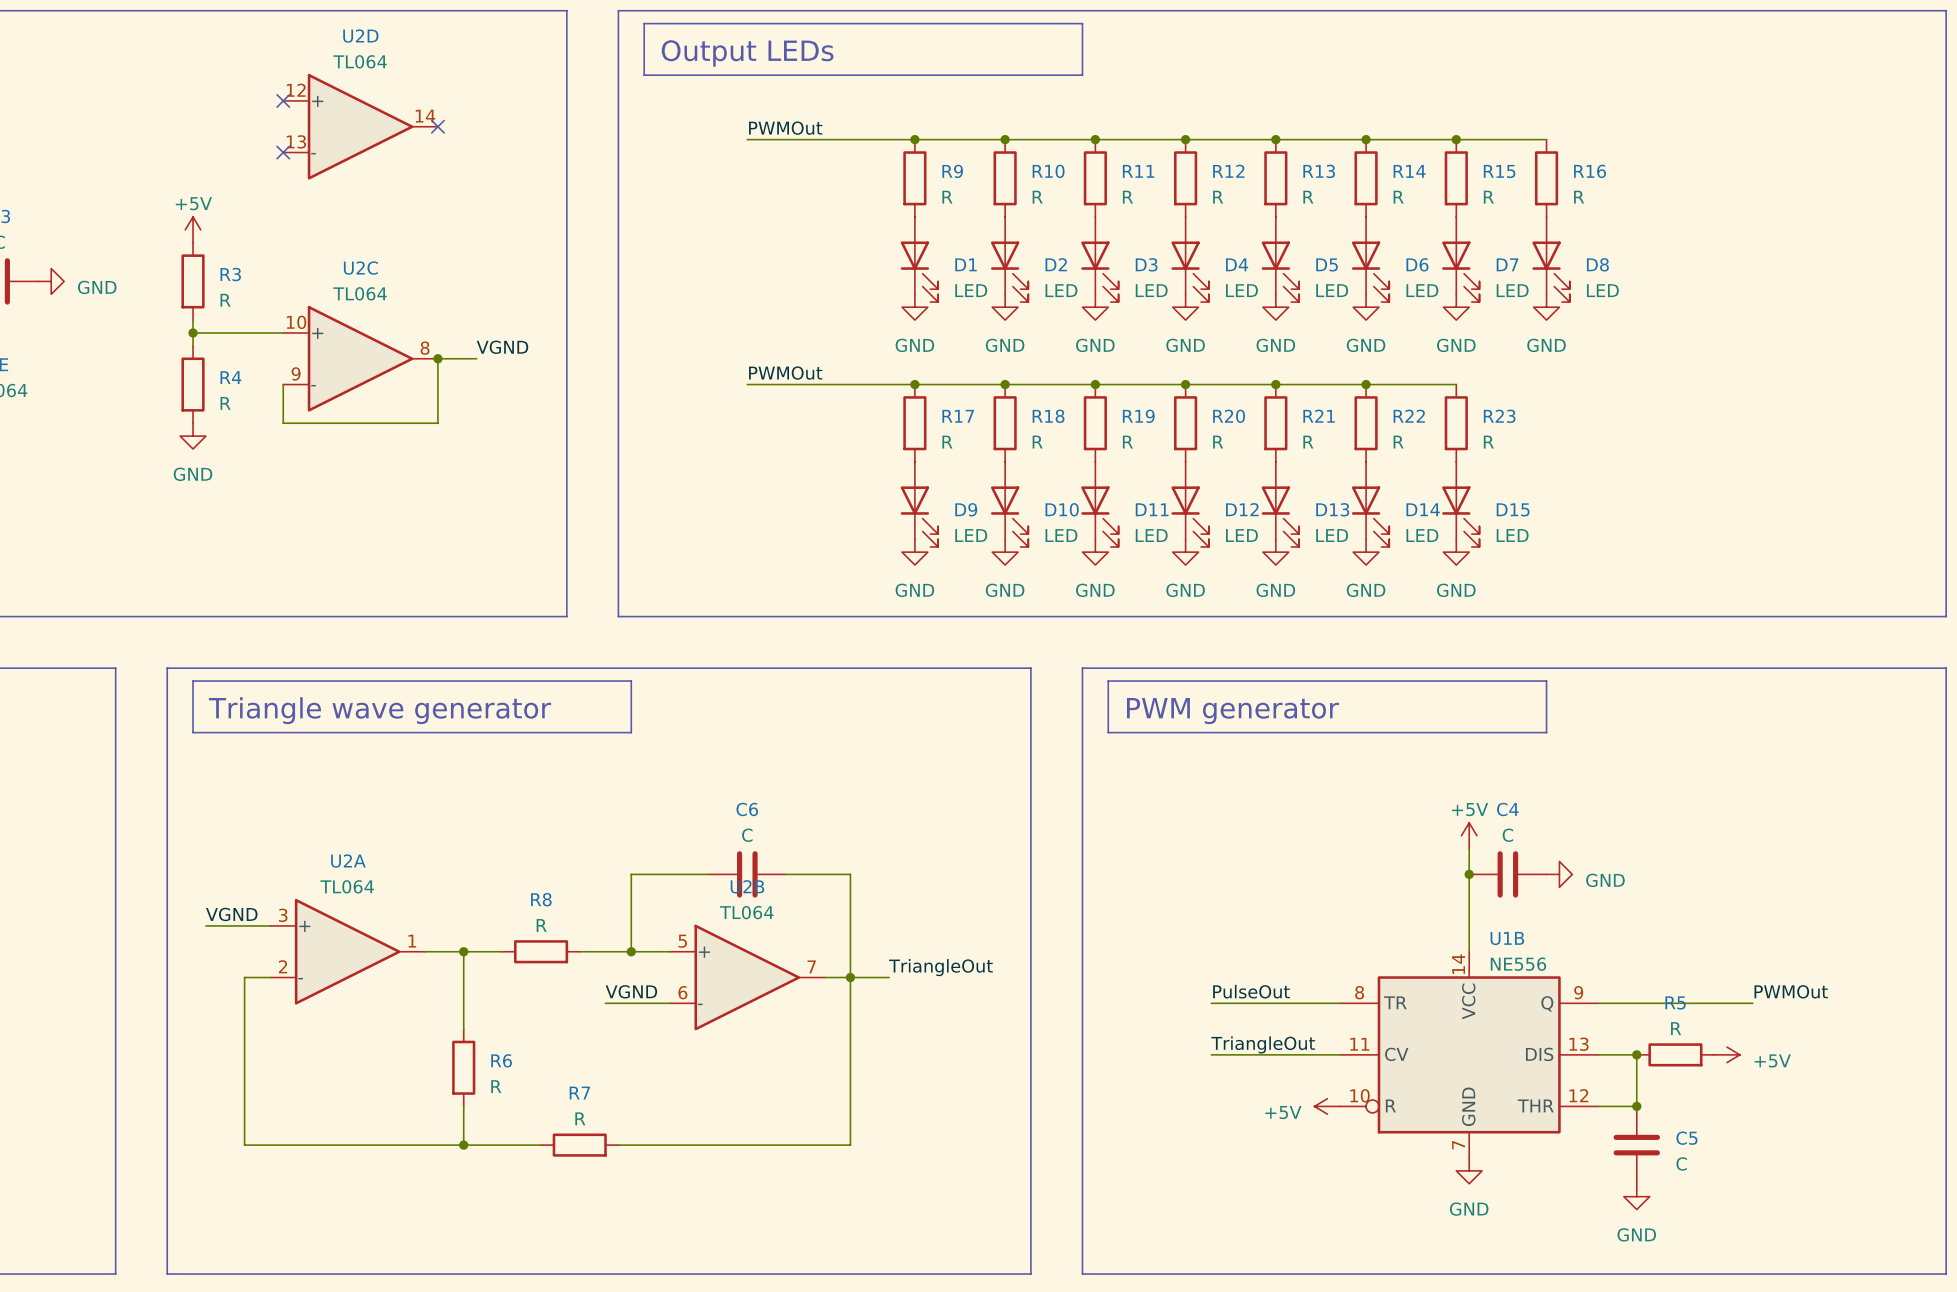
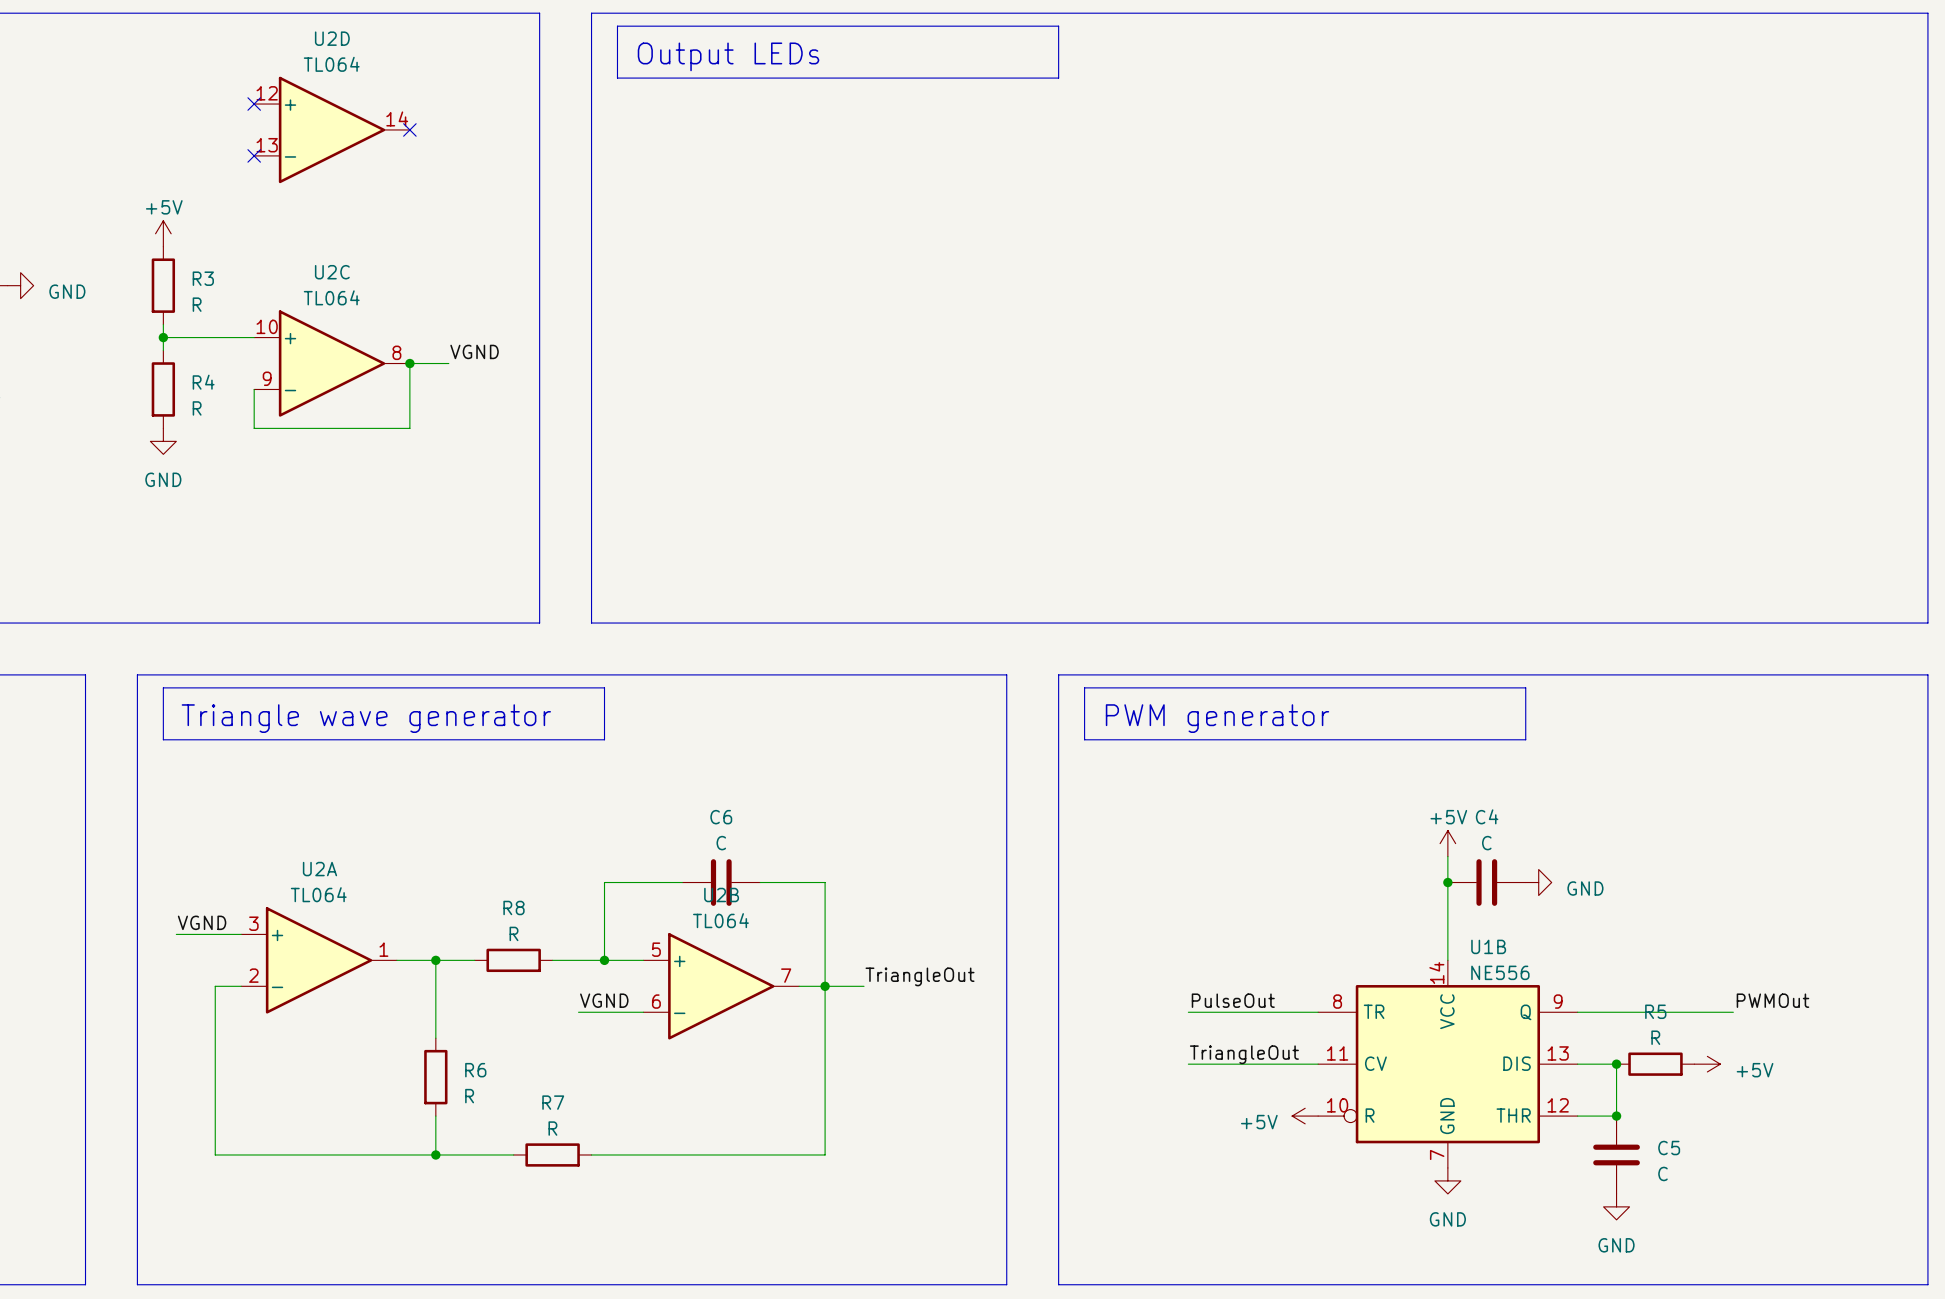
label: PWMOut (785, 128) -> none
wire: (747, 139) (1546, 139) -> none
junction: (914, 139) -> none
junction: (1005, 139) -> none
junction: (1095, 139) -> none
junction: (1185, 139) -> none
junction: (1275, 139) -> none
junction: (1366, 139) -> none
junction: (1456, 139) -> none
R9: R (914, 178) -> none
R10: R (1005, 178) -> none
R11: R (1095, 178) -> none
R12: R (1185, 178) -> none
R13: R (1275, 178) -> none
R14: R (1366, 178) -> none
R15: R (1456, 178) -> none
R16: R (1546, 178) -> none
D1: LED (919, 259) -> none
D2: LED (1009, 259) -> none
D3: LED (1099, 259) -> none
D4: LED (1190, 259) -> none
D5: LED (1280, 259) -> none
D6: LED (1370, 259) -> none
D7: LED (1460, 259) -> none
D8: LED (1551, 259) -> none
power symbol: GND (914, 307) -> none
power symbol: GND (1005, 307) -> none
power symbol: GND (1095, 307) -> none
power symbol: GND (1185, 307) -> none
power symbol: GND (1275, 307) -> none
power symbol: GND (1366, 307) -> none
power symbol: GND (1456, 307) -> none
power symbol: GND (1546, 307) -> none
label: PWMOut (785, 373) -> none
wire: (747, 384) (1456, 384) -> none
junction: (914, 384) -> none
junction: (1005, 384) -> none
junction: (1095, 384) -> none
junction: (1185, 384) -> none
junction: (1275, 384) -> none
junction: (1366, 384) -> none
R17: R (914, 423) -> none
R18: R (1005, 423) -> none
R19: R (1095, 423) -> none
R20: R (1185, 423) -> none
R21: R (1275, 423) -> none
R22: R (1366, 423) -> none
R23: R (1456, 423) -> none
D9: LED (919, 504) -> none
D10: LED (1009, 504) -> none
D11: LED (1099, 504) -> none
D12: LED (1190, 504) -> none
D13: LED (1280, 504) -> none
D14: LED (1370, 504) -> none
D15: LED (1460, 504) -> none
power symbol: GND (914, 552) -> none
power symbol: GND (1005, 552) -> none
power symbol: GND (1095, 552) -> none
power symbol: GND (1185, 552) -> none
power symbol: GND (1275, 552) -> none
power symbol: GND (1366, 552) -> none
power symbol: GND (1456, 552) -> none

